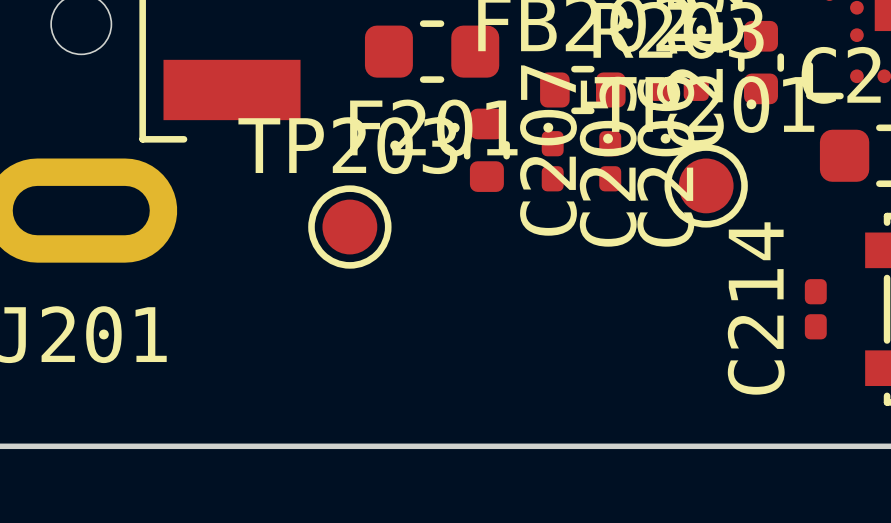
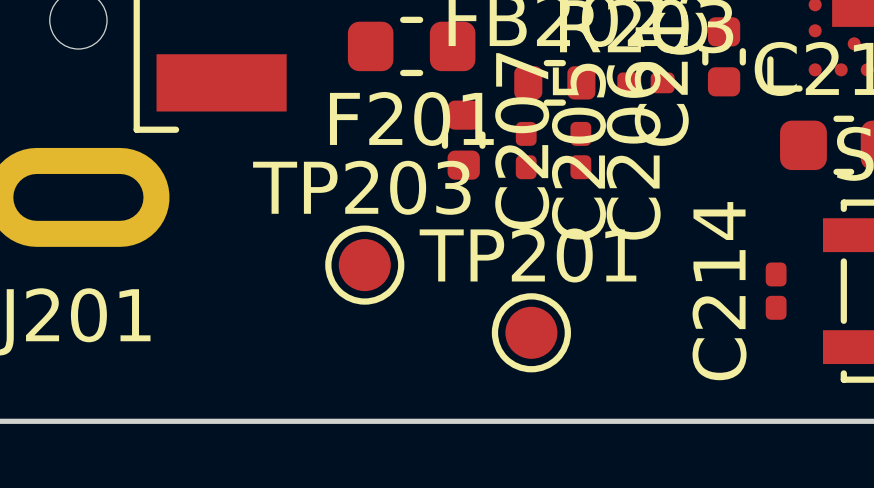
TP201 position: (706, 185) -> (531, 332)
TP203 position: (349, 227) -> (364, 265)

